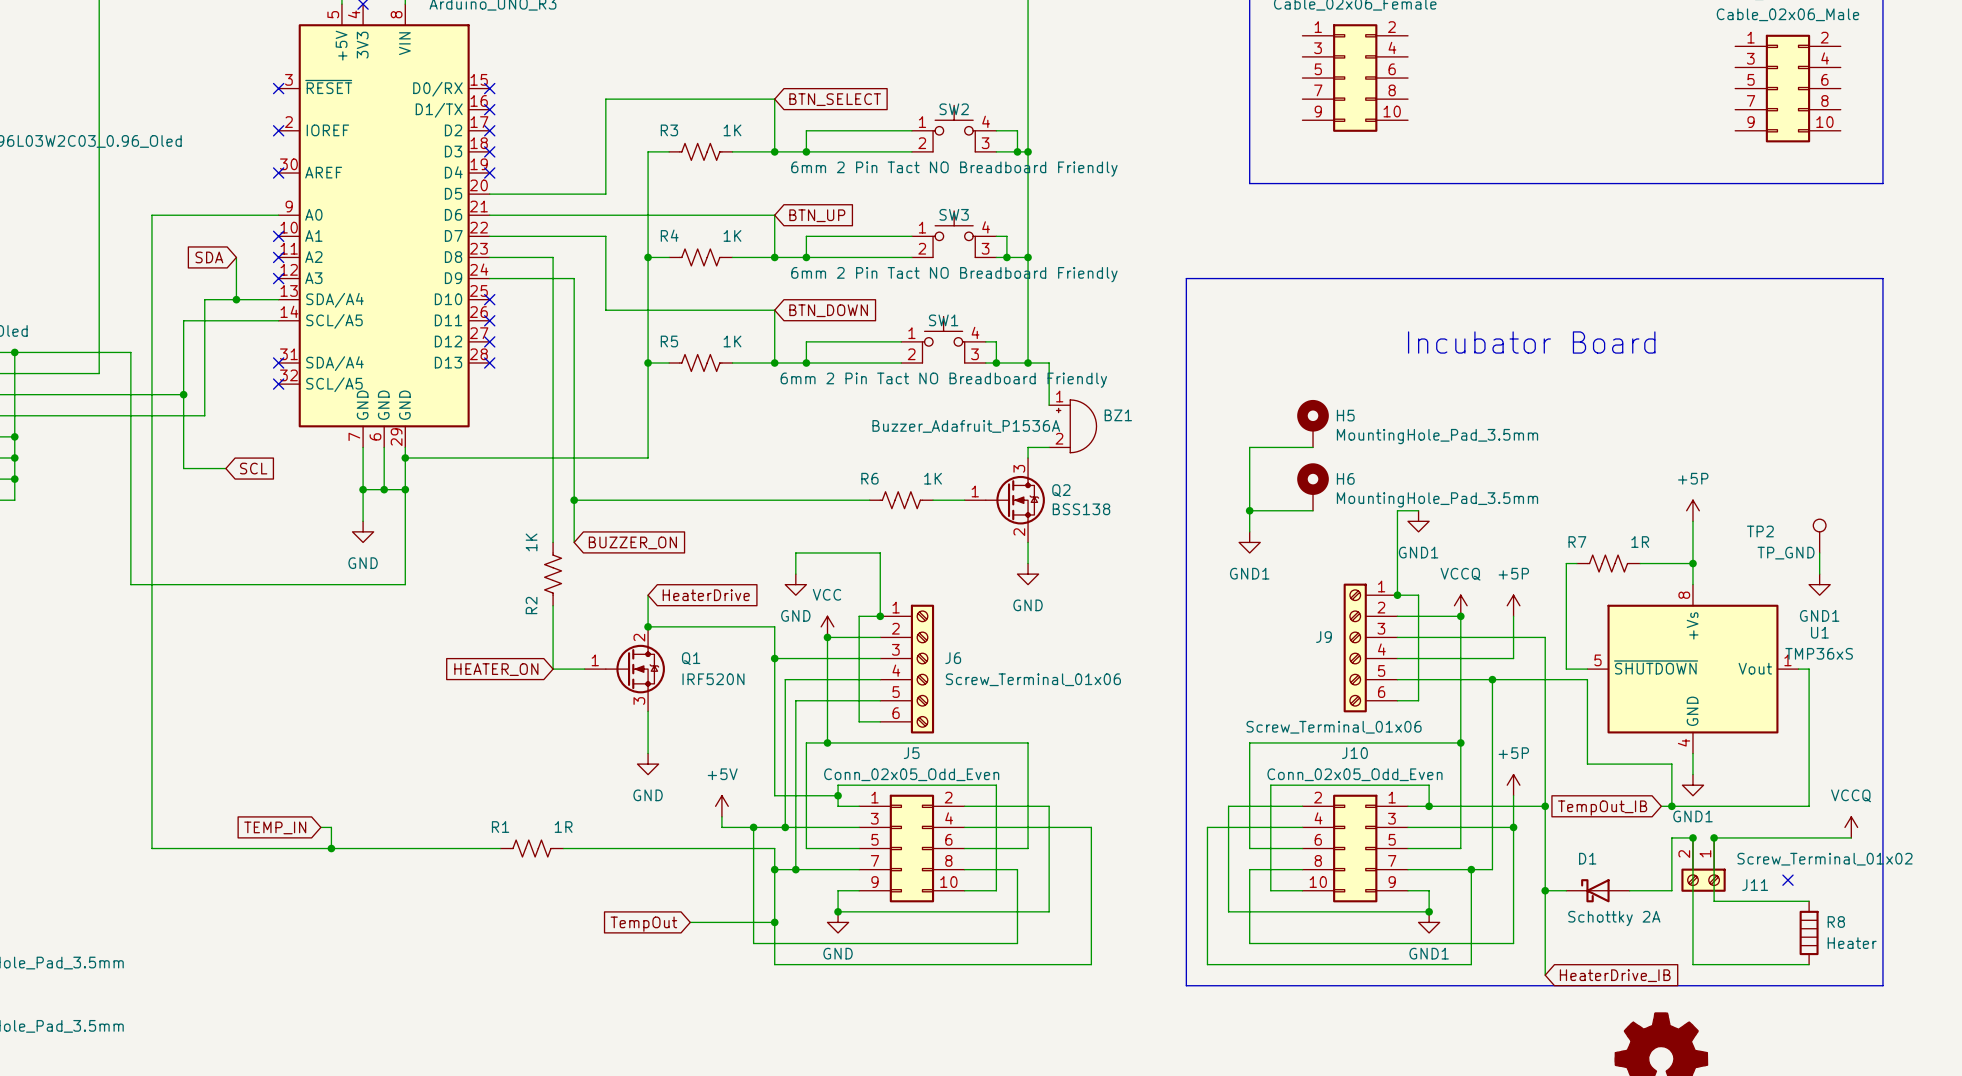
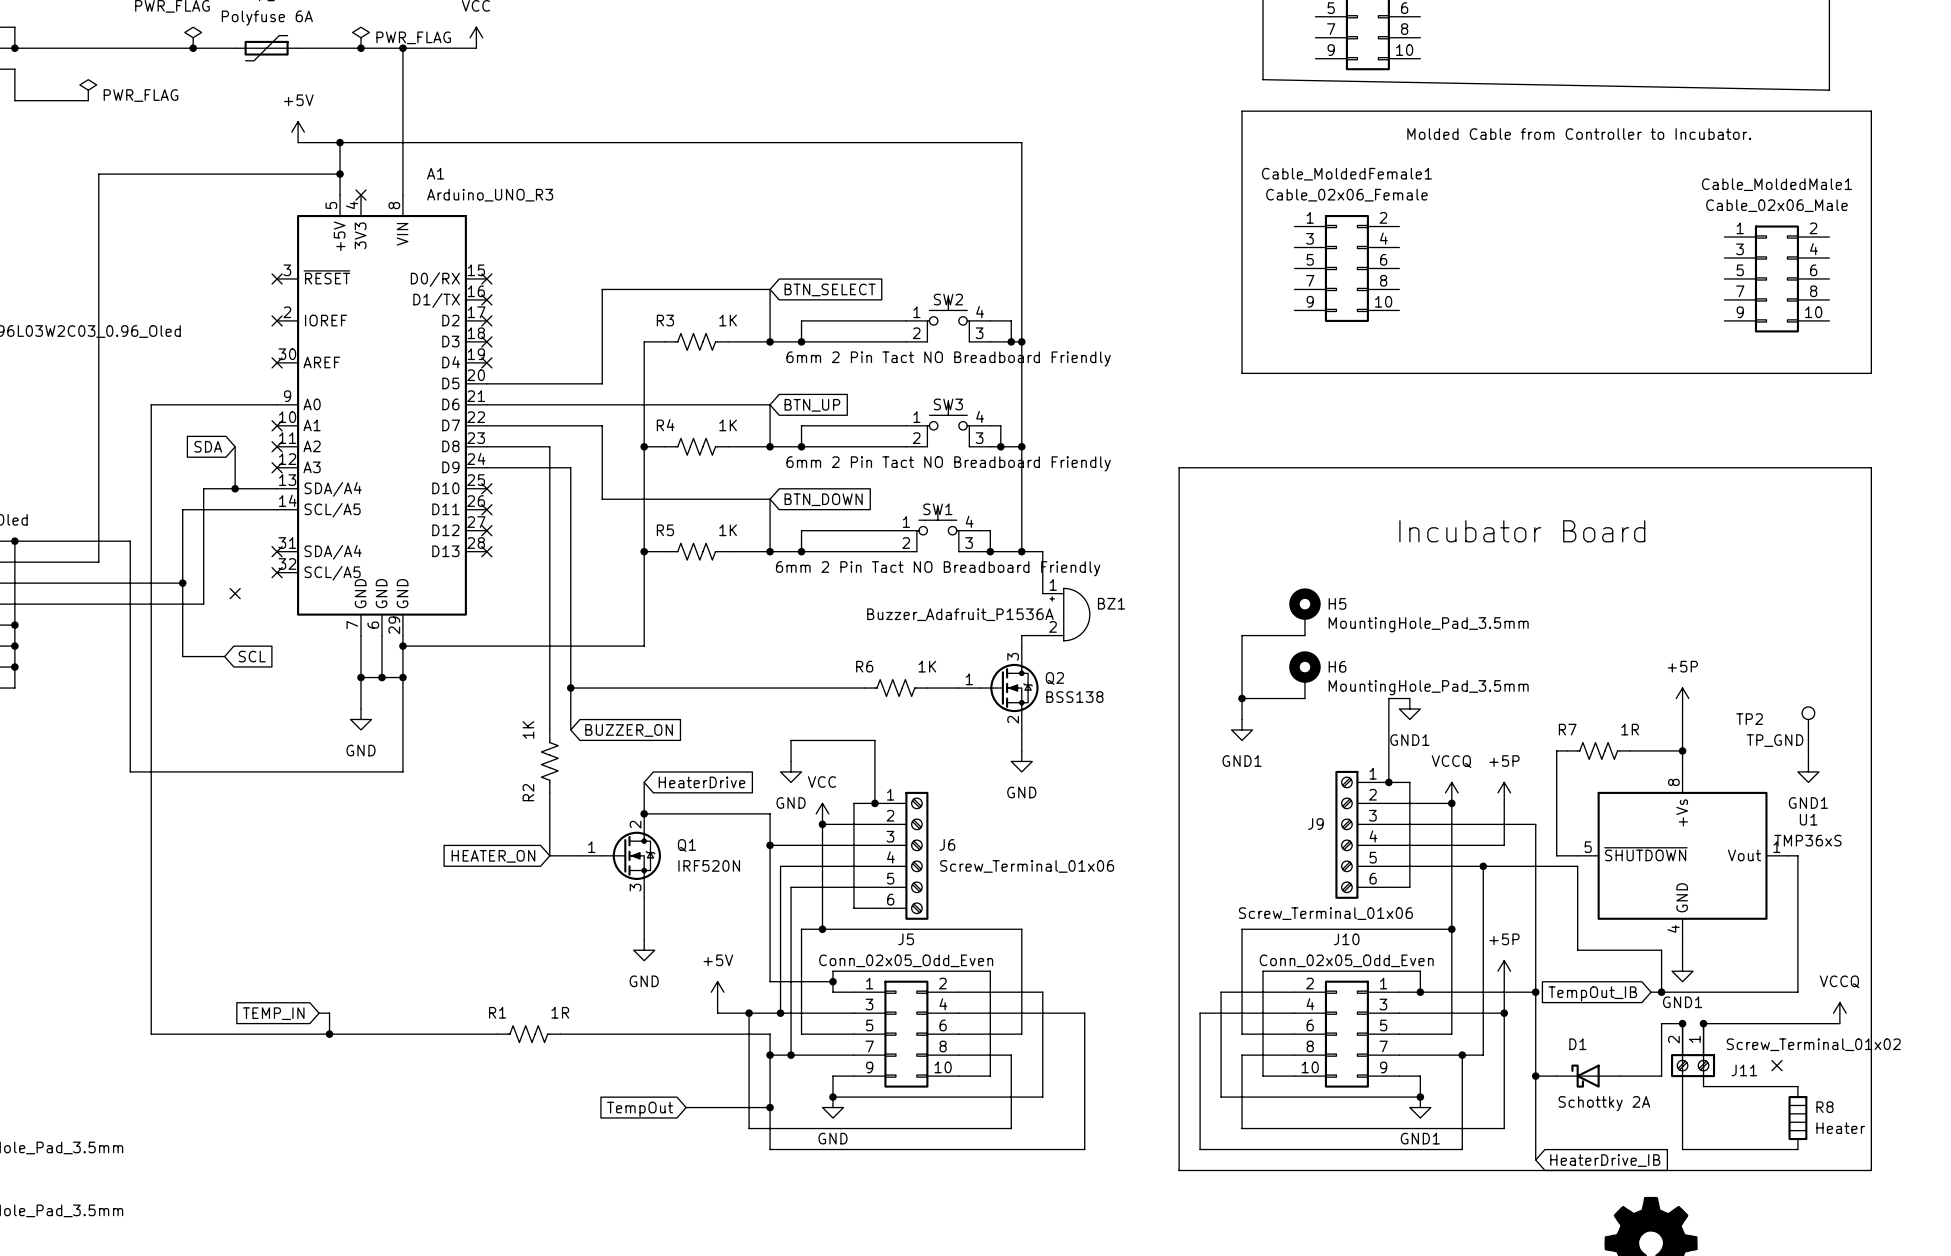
no-connect mark: none -> (235, 593)

